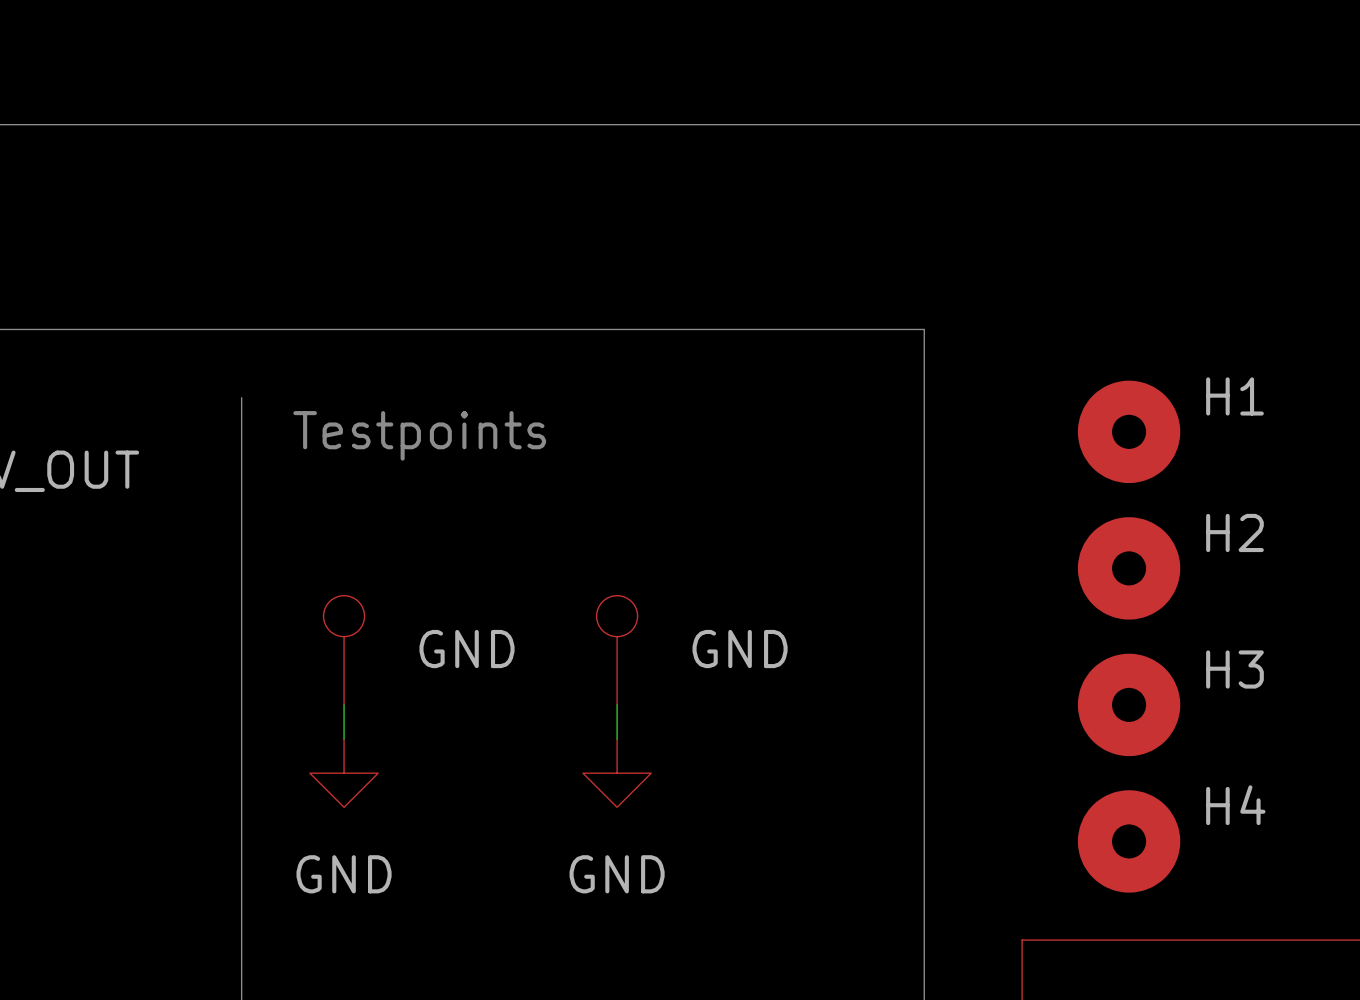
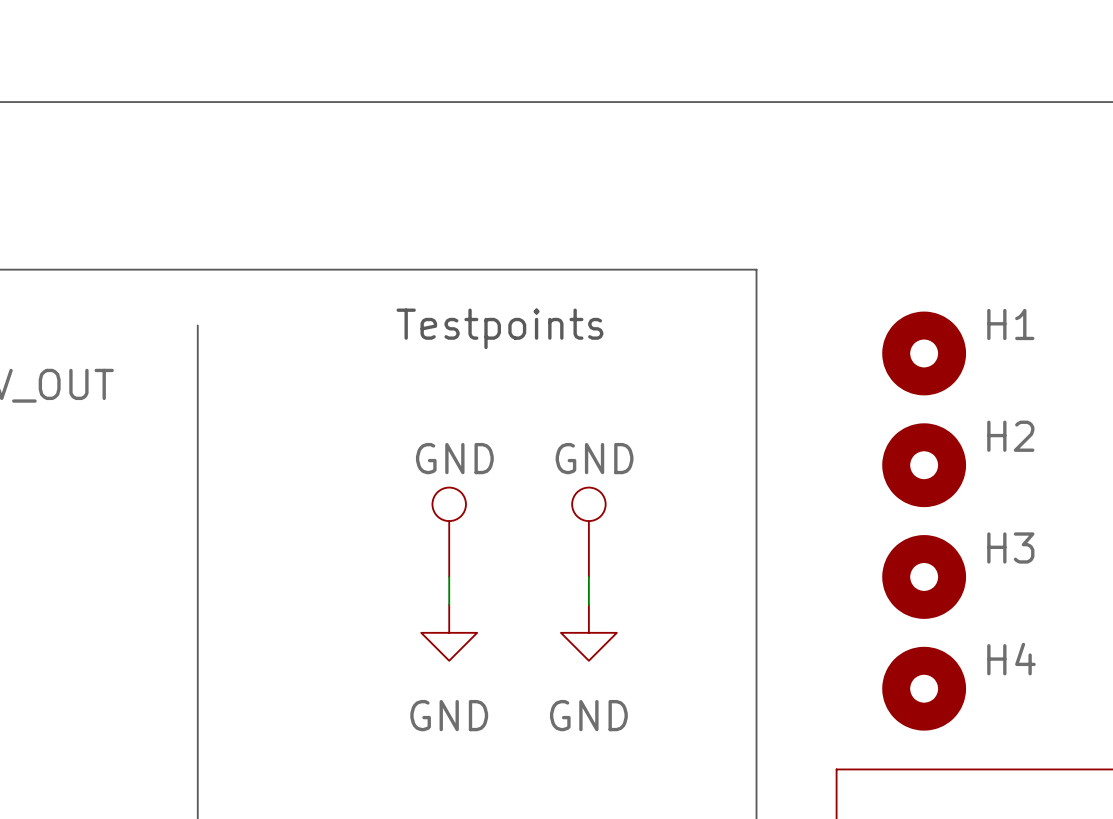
text position: Testpoints (419, 435) -> Testpoints (499, 328)
part: GND (344, 650) -> none
part: none -> GND (449, 532)
part: GND (617, 650) -> none
part: none -> GND (588, 532)
wire: (344, 704) (344, 739) -> (588, 576) (588, 604)
wire: (617, 704) (617, 739) -> (449, 576) (449, 604)
power symbol: GND (344, 773) -> none
power symbol: none -> GND (449, 632)
power symbol: GND (617, 773) -> none
power symbol: none -> GND (588, 632)

